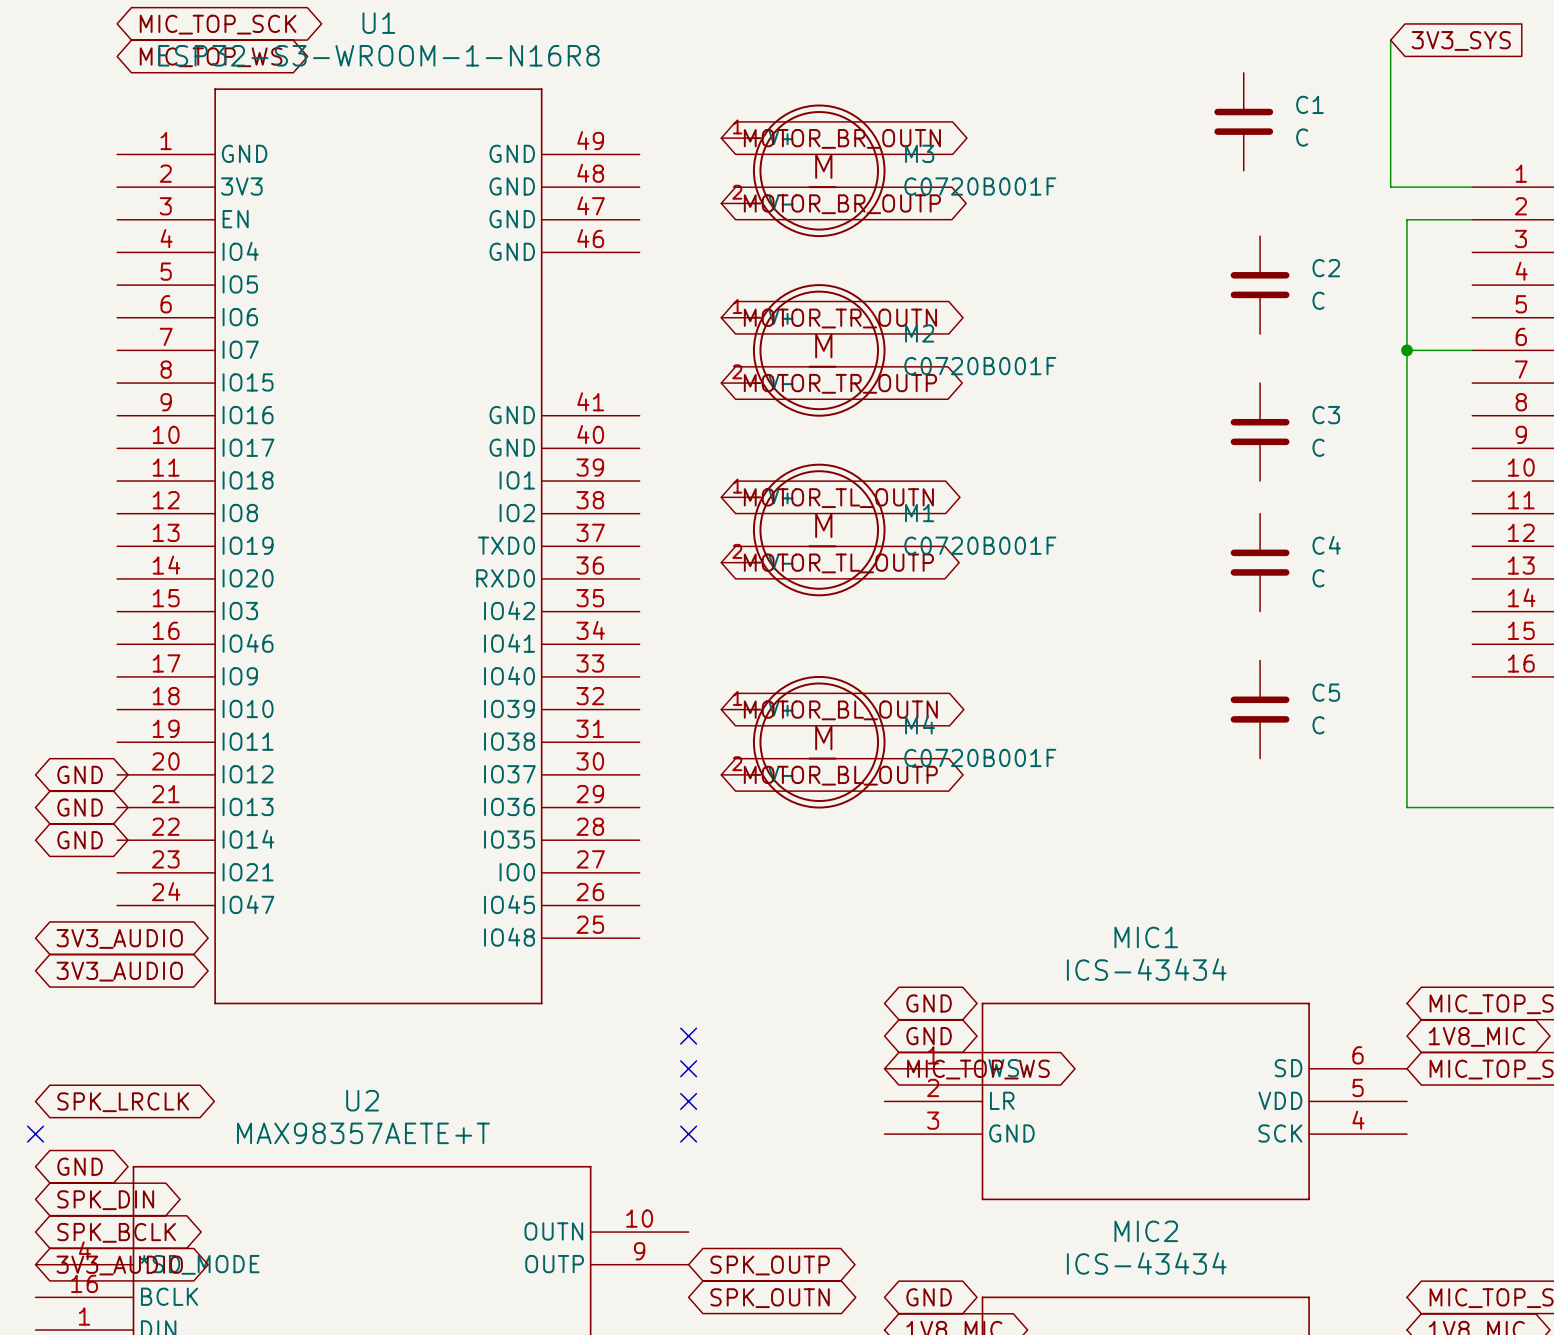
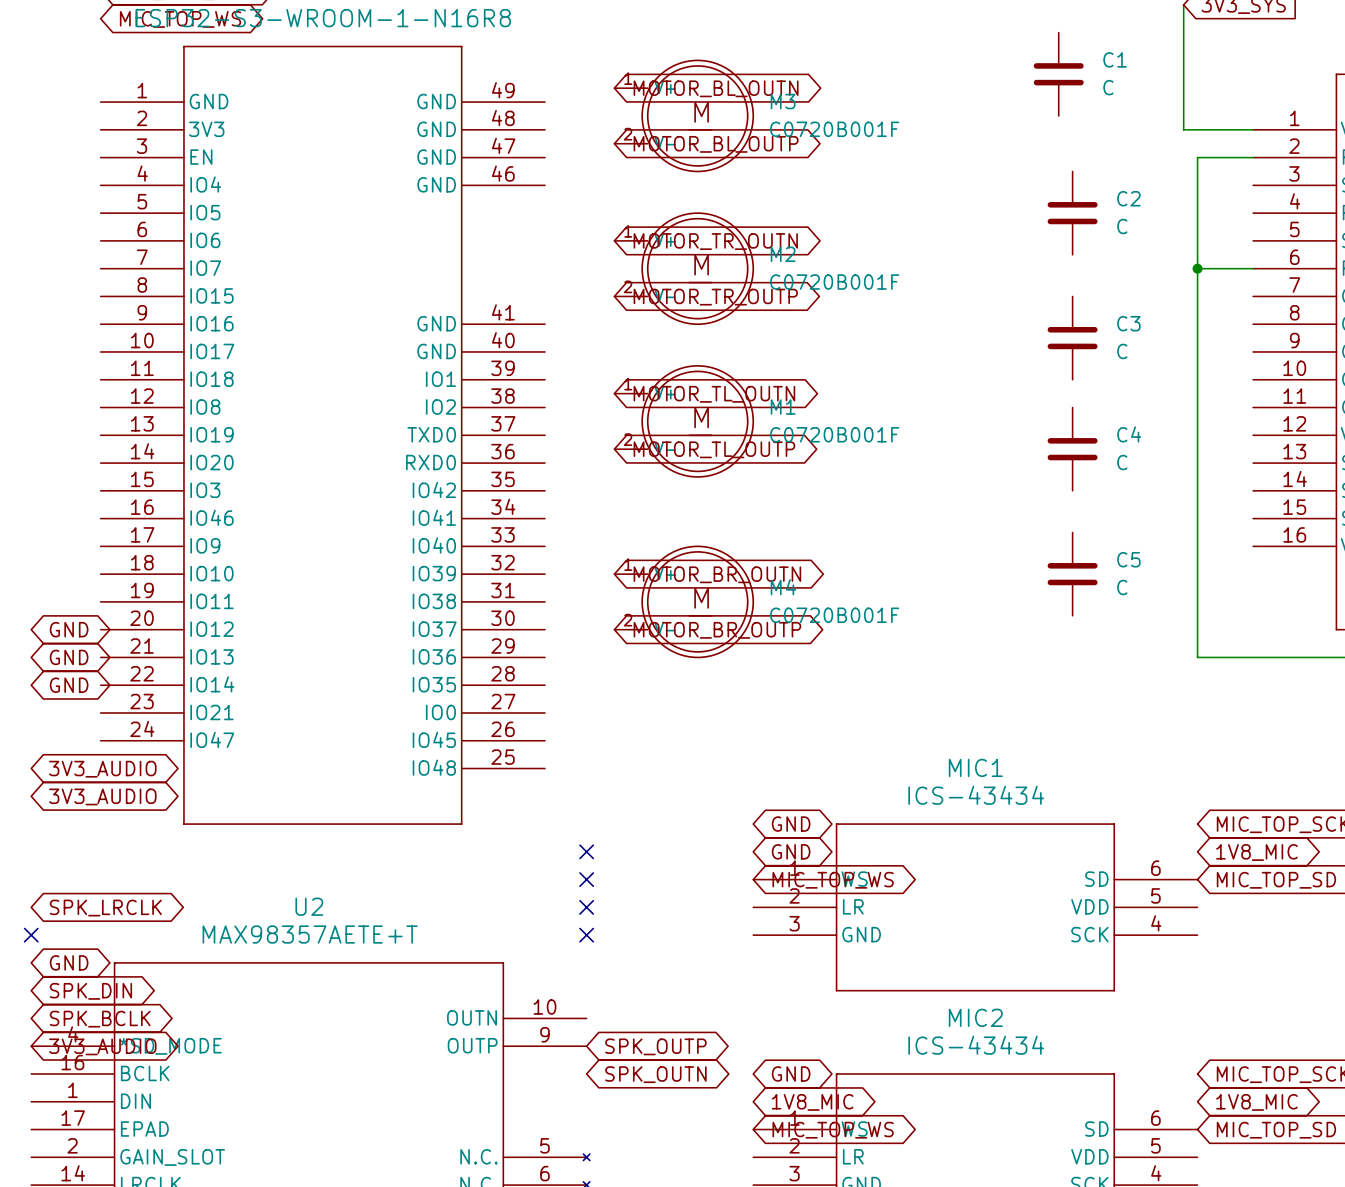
global label: MOTOR_BR_OUTN (842, 138) -> MOTOR_BL_OUTN (716, 88)
global label: MOTOR_BR_OUTP (842, 204) -> MOTOR_BL_OUTP (716, 144)
global label: MOTOR_BL_OUTN (840, 710) -> MOTOR_BR_OUTN (717, 574)
global label: MOTOR_BL_OUTP (840, 775) -> MOTOR_BR_OUTP (717, 630)

